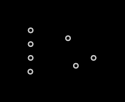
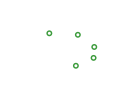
via: (30, 30) -> none
via: none -> (49, 33)
via: none -> (77, 34)
via: (68, 38) -> none
via: (30, 44) -> none
via: none -> (94, 46)
via: (30, 57) -> none
via: (30, 71) -> none

